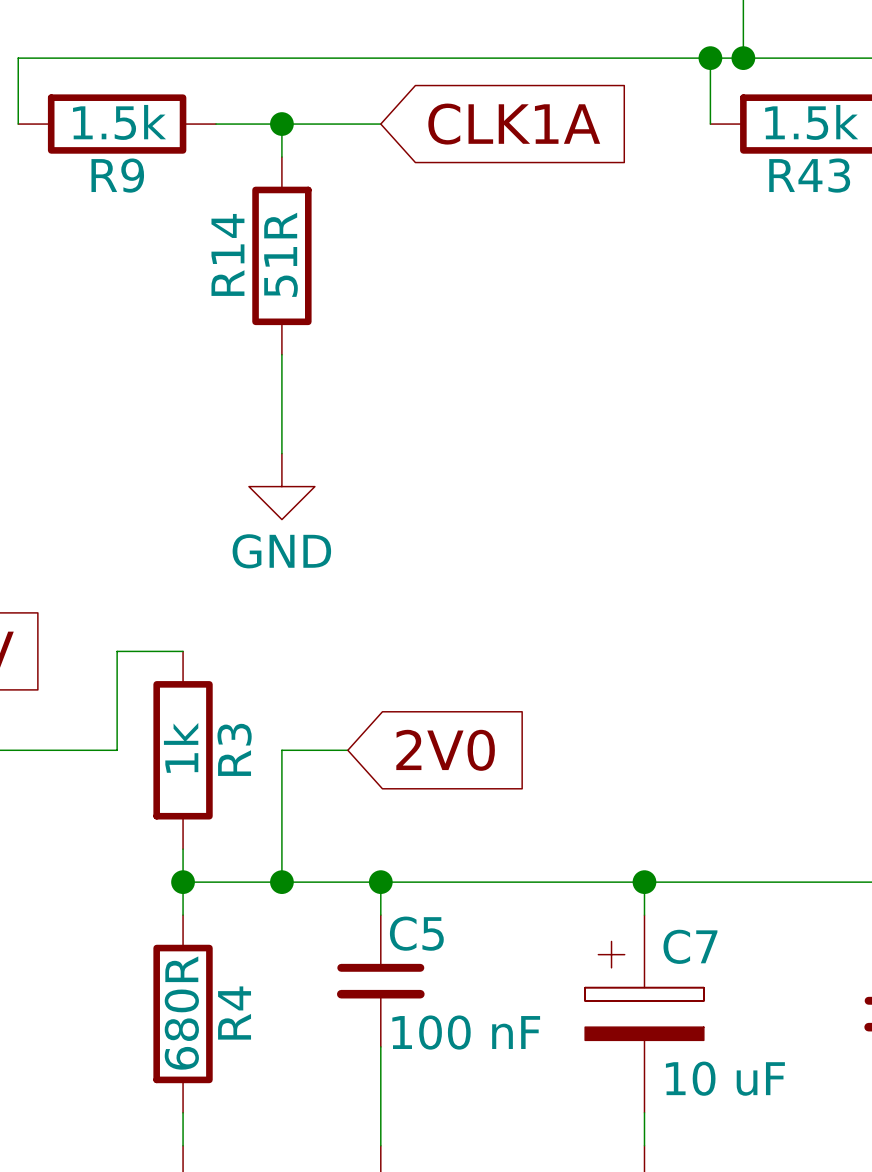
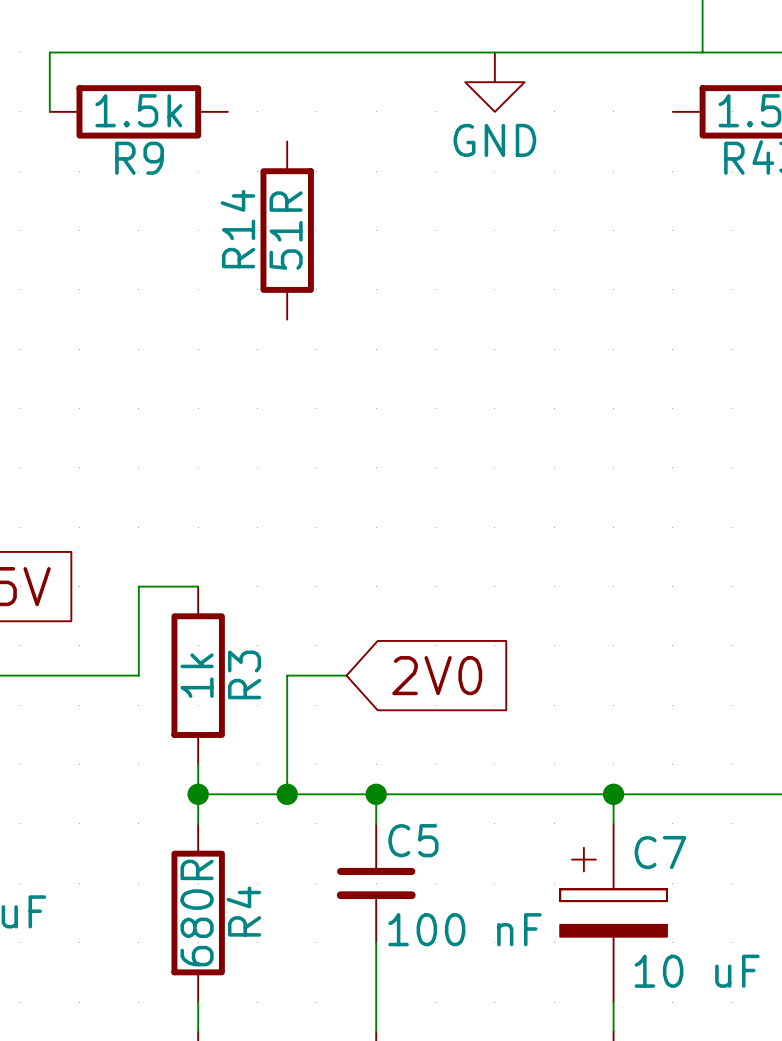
wire: (710, 58) (710, 124) -> none
junction: (710, 58) -> none
junction: (743, 58) -> none
power symbol: none -> GND (494, 82)
wire: (216, 124) (380, 124) -> none
wire: (281, 124) (281, 157) -> none
junction: (281, 124) -> none
global label: CLK1A (514, 124) -> none
wire: (281, 354) (281, 453) -> none
power symbol: GND (281, 486) -> none

